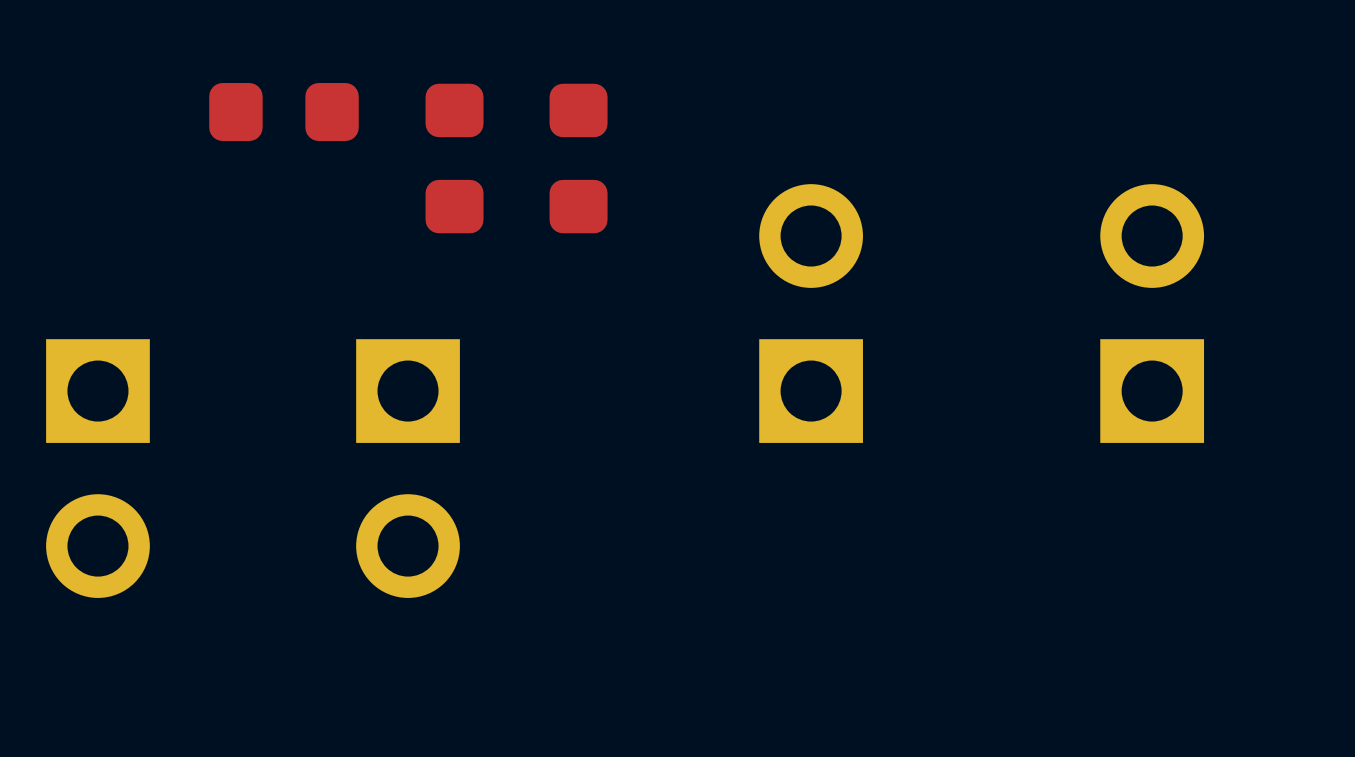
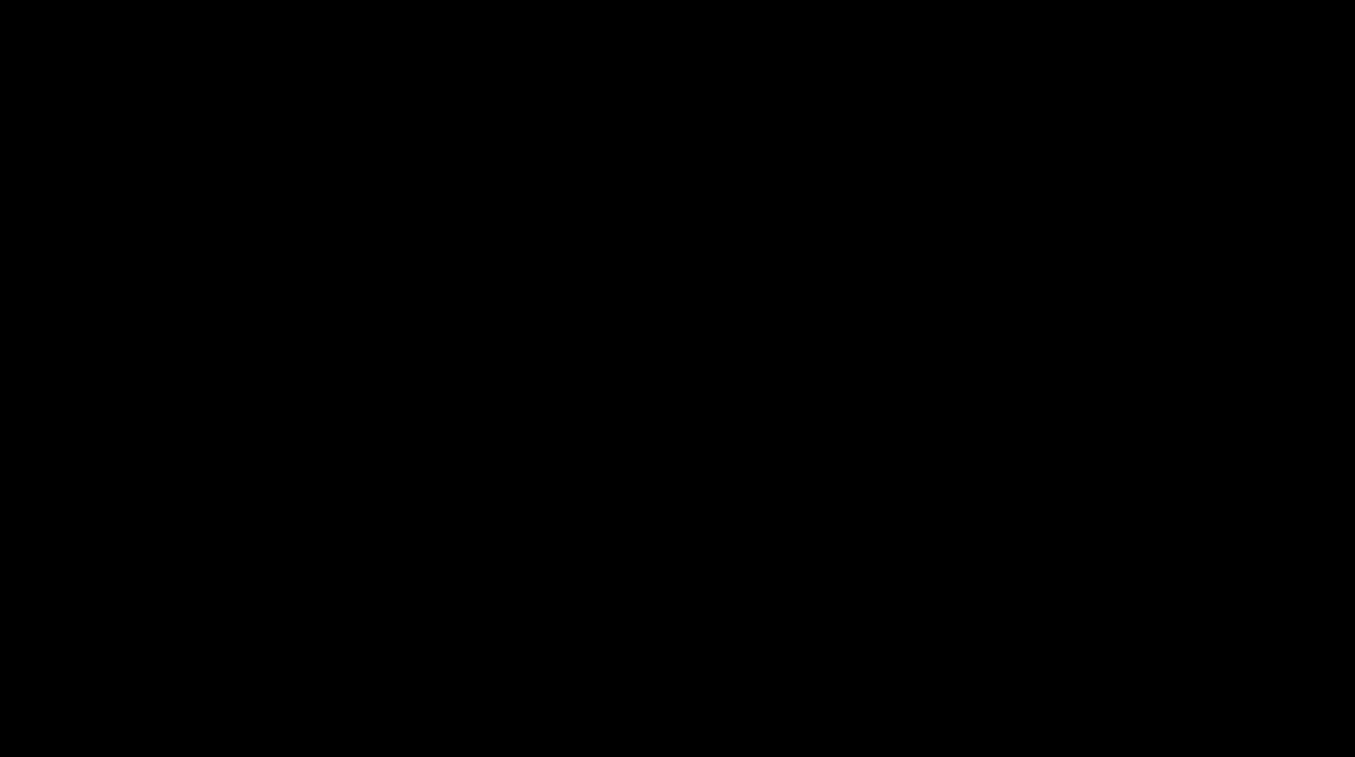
part: (284, 112) -> none
part: (454, 158) -> none
part: (578, 158) -> none
part: (811, 313) -> none
part: (1152, 313) -> none
part: (97, 468) -> none
part: (408, 468) -> none

